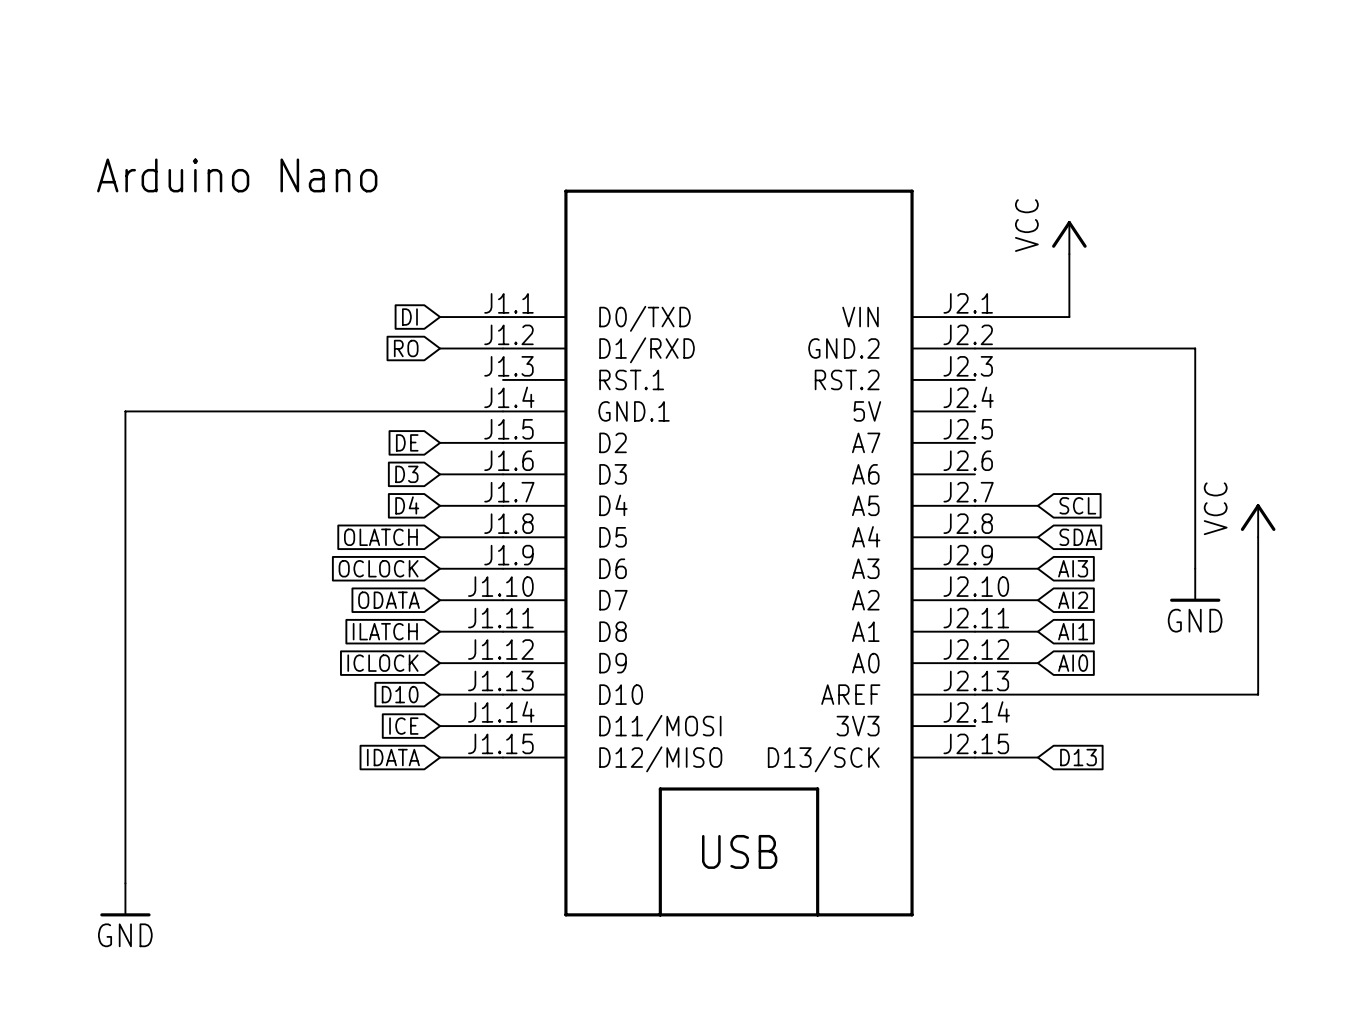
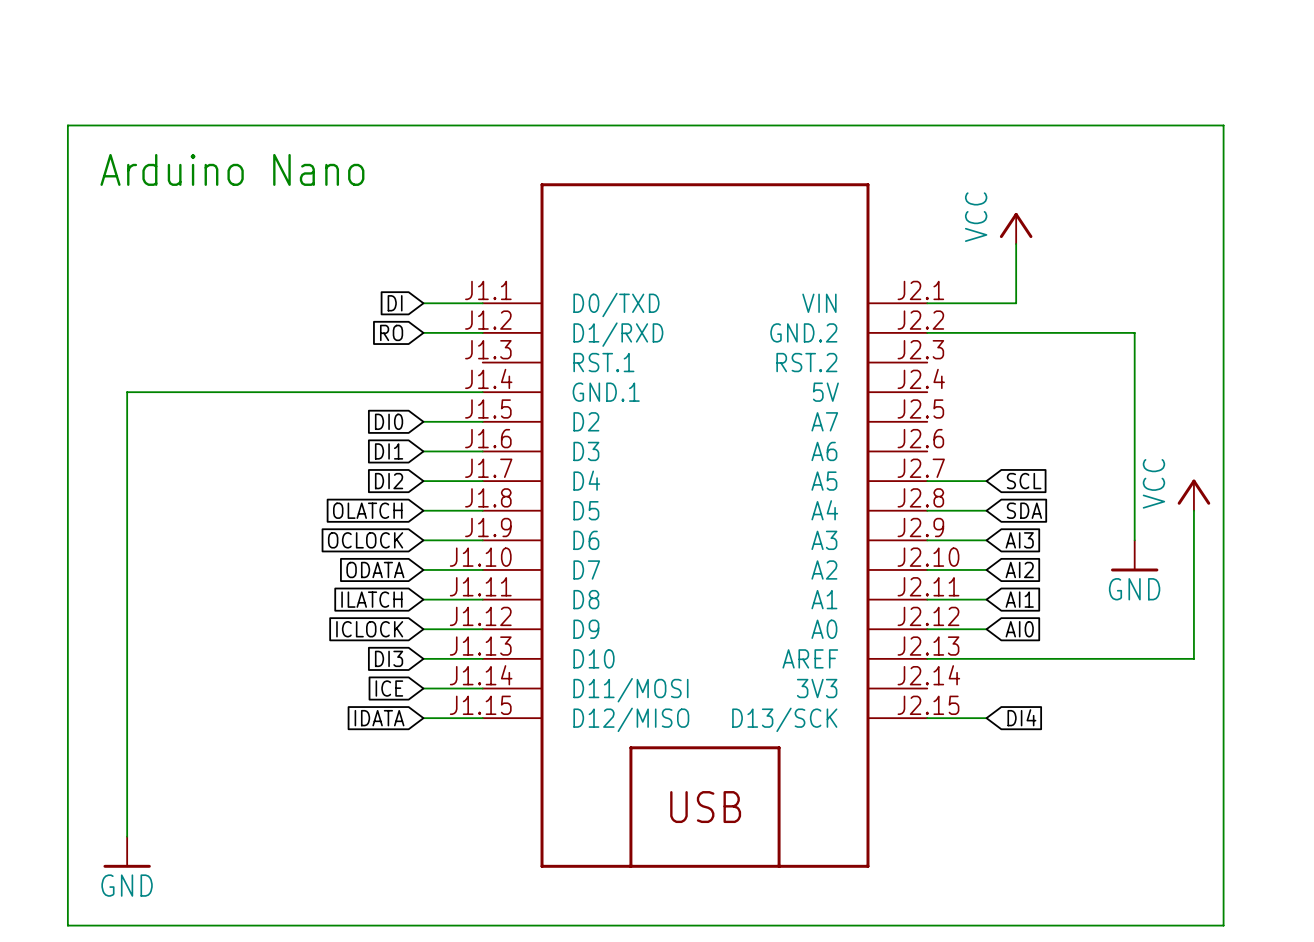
wire: none -> (67, 125) (67, 925) (1223, 925) (1223, 125) (67, 125)
global label: DE (407, 442) -> DI0 (389, 421)
global label: D3 (406, 474) -> DI1 (389, 451)
global label: D4 (407, 505) -> DI2 (389, 481)
global label: D10 (400, 694) -> DI3 (389, 658)
global label: D13 (1078, 757) -> DI4 (1021, 717)

